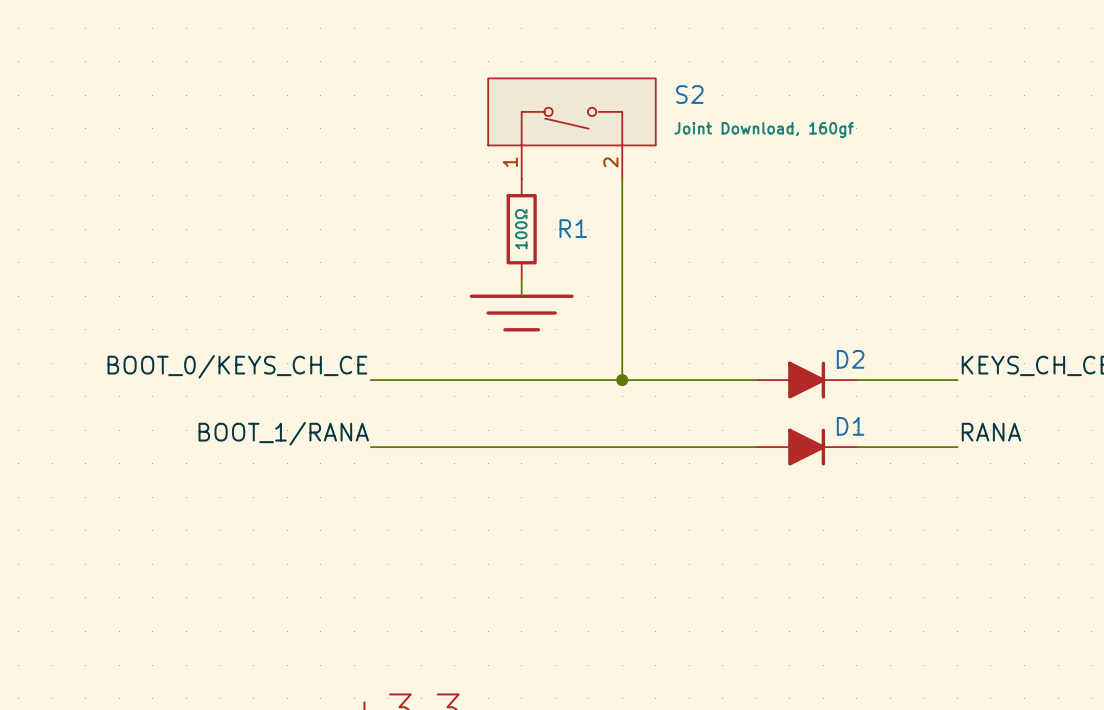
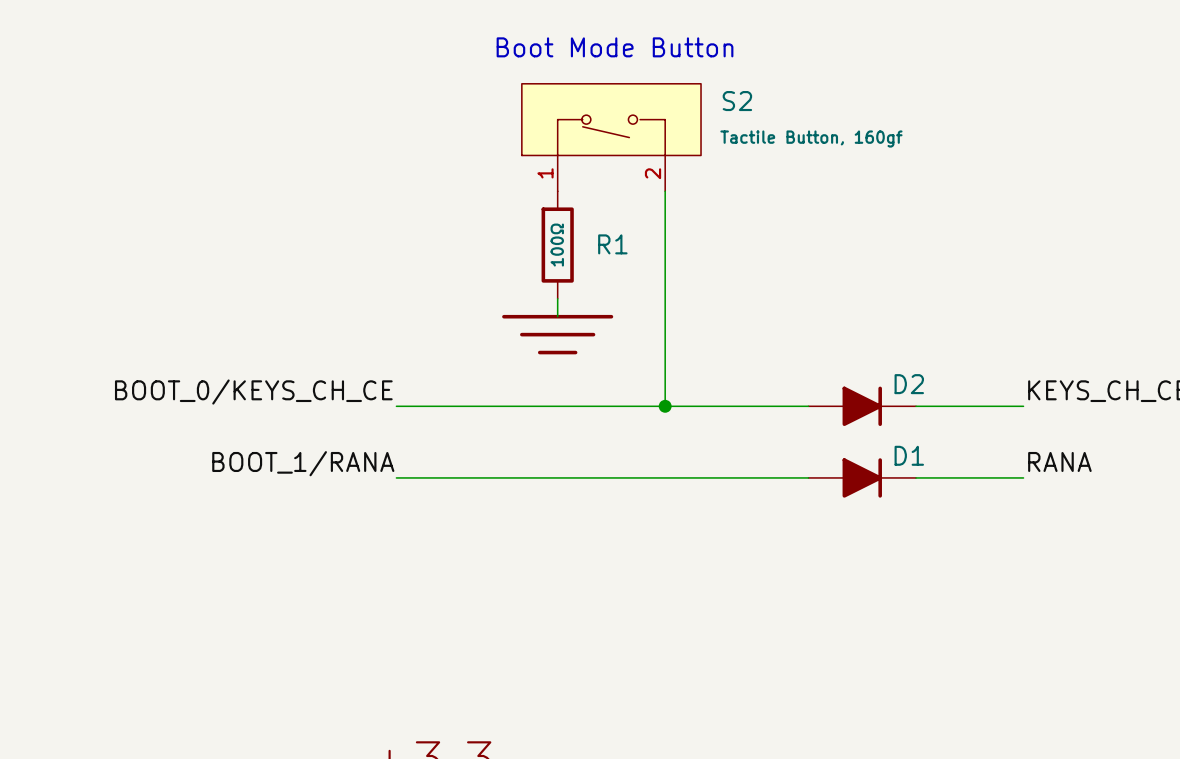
text: none -> Boot Mode Button (615, 47)
S2 value: Joint Download, 160gf (764, 130) -> Tactile Button, 160gf (811, 139)

